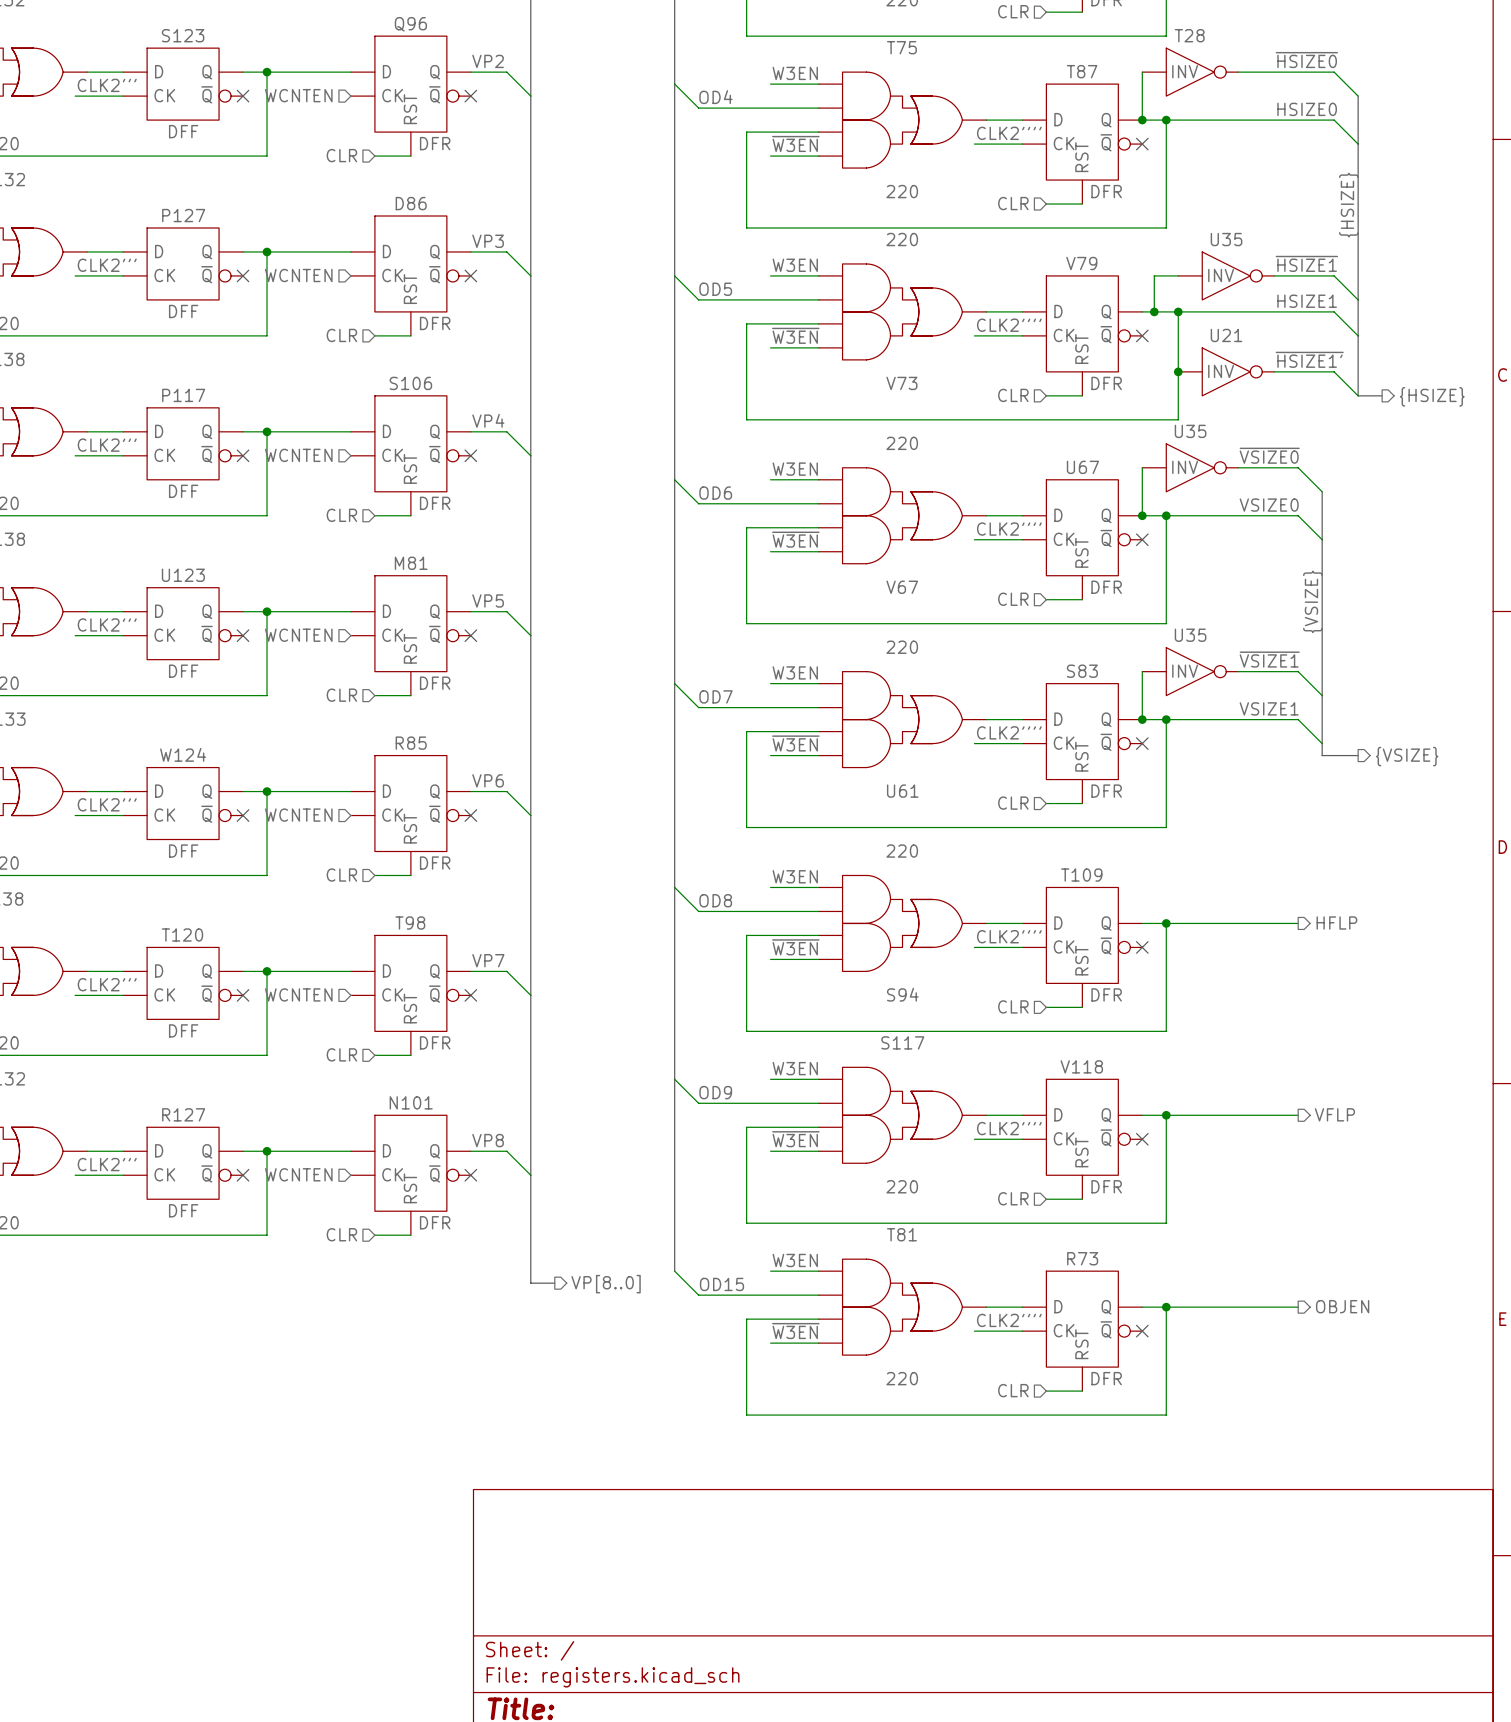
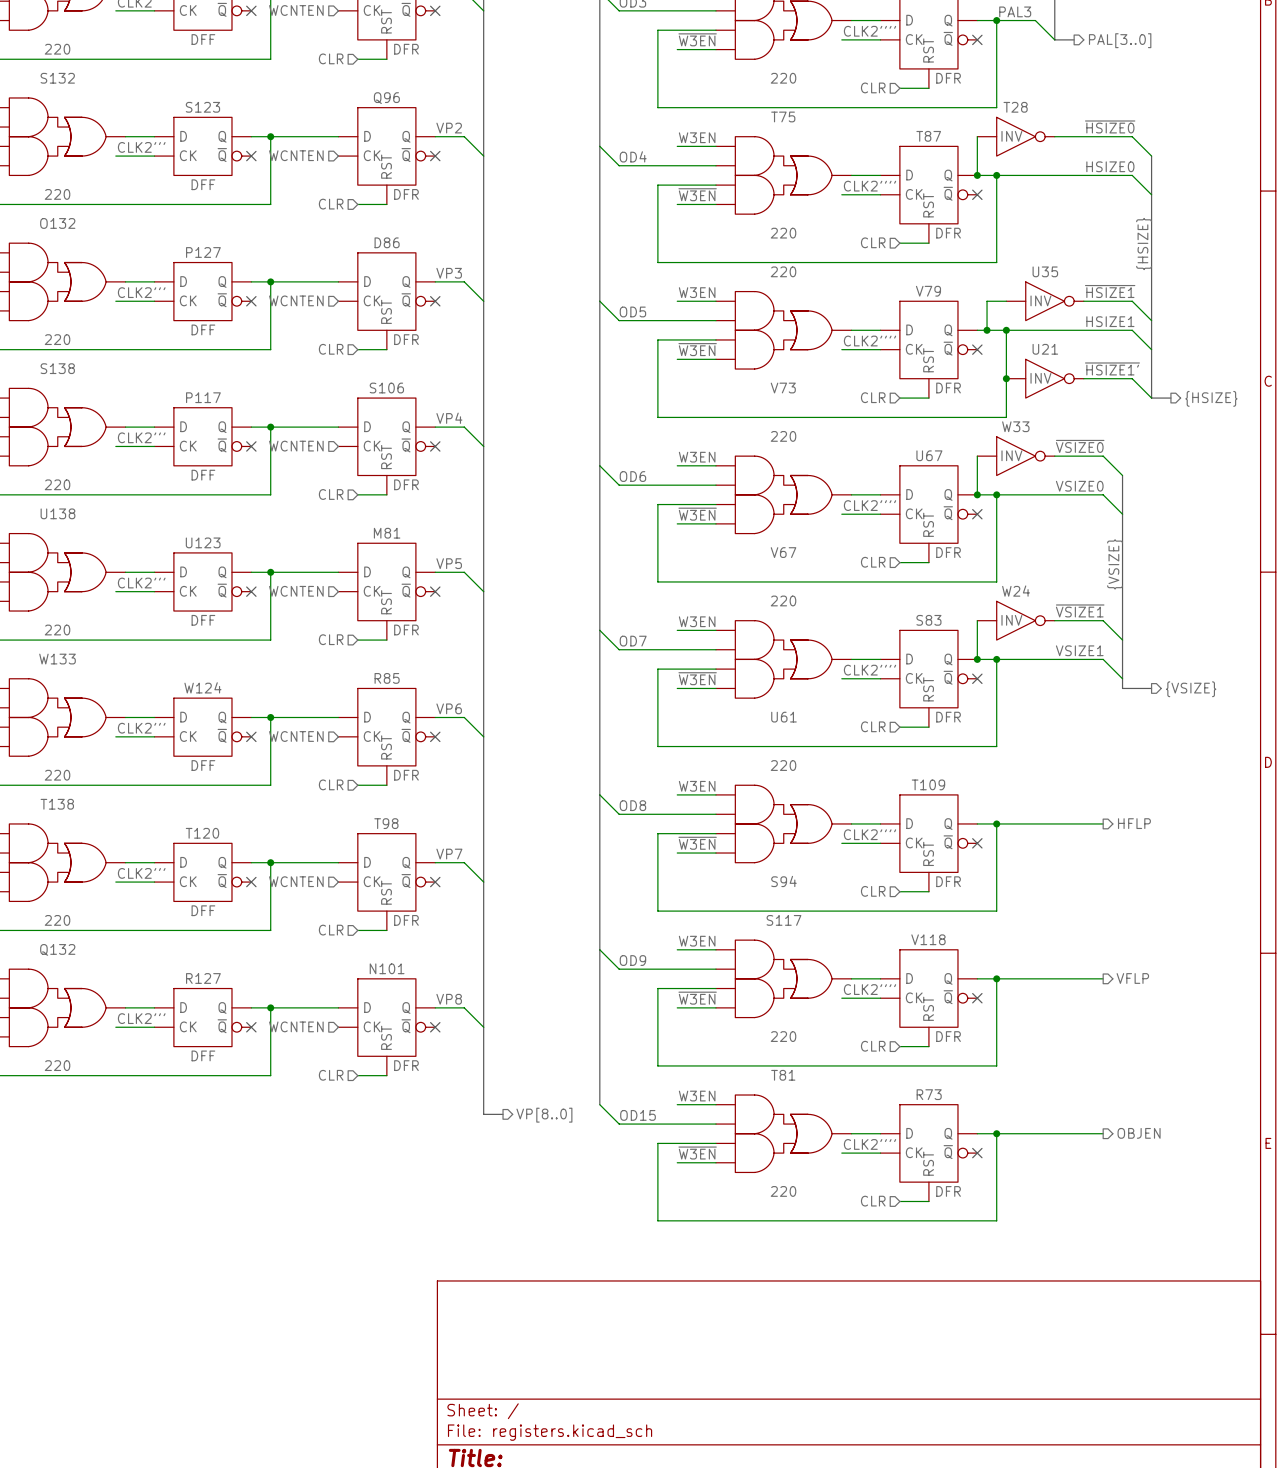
U35 name: U35 (1190, 431) -> W33 (1015, 426)
U35 name: U35 (1190, 635) -> W24 (1016, 591)

